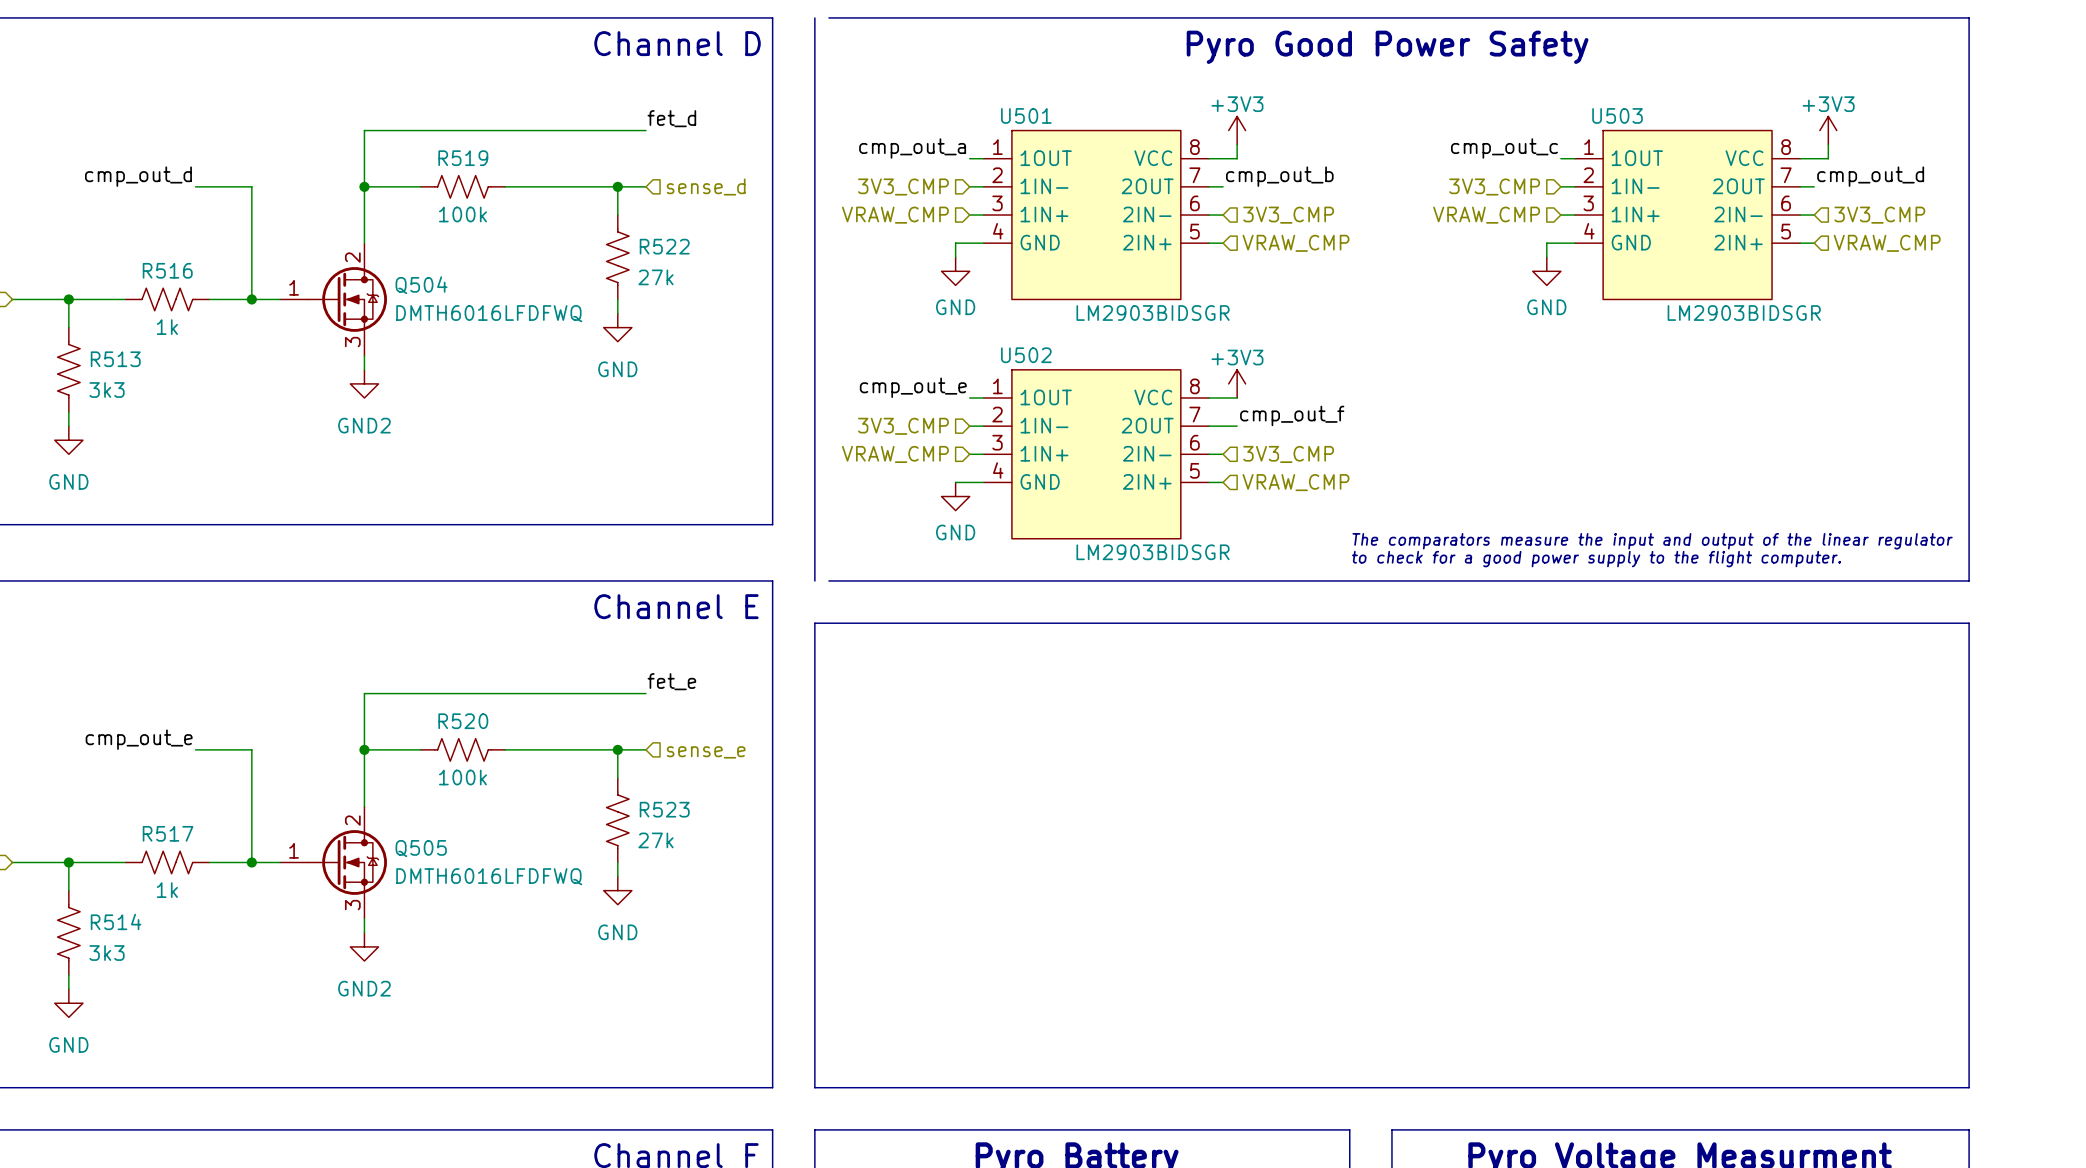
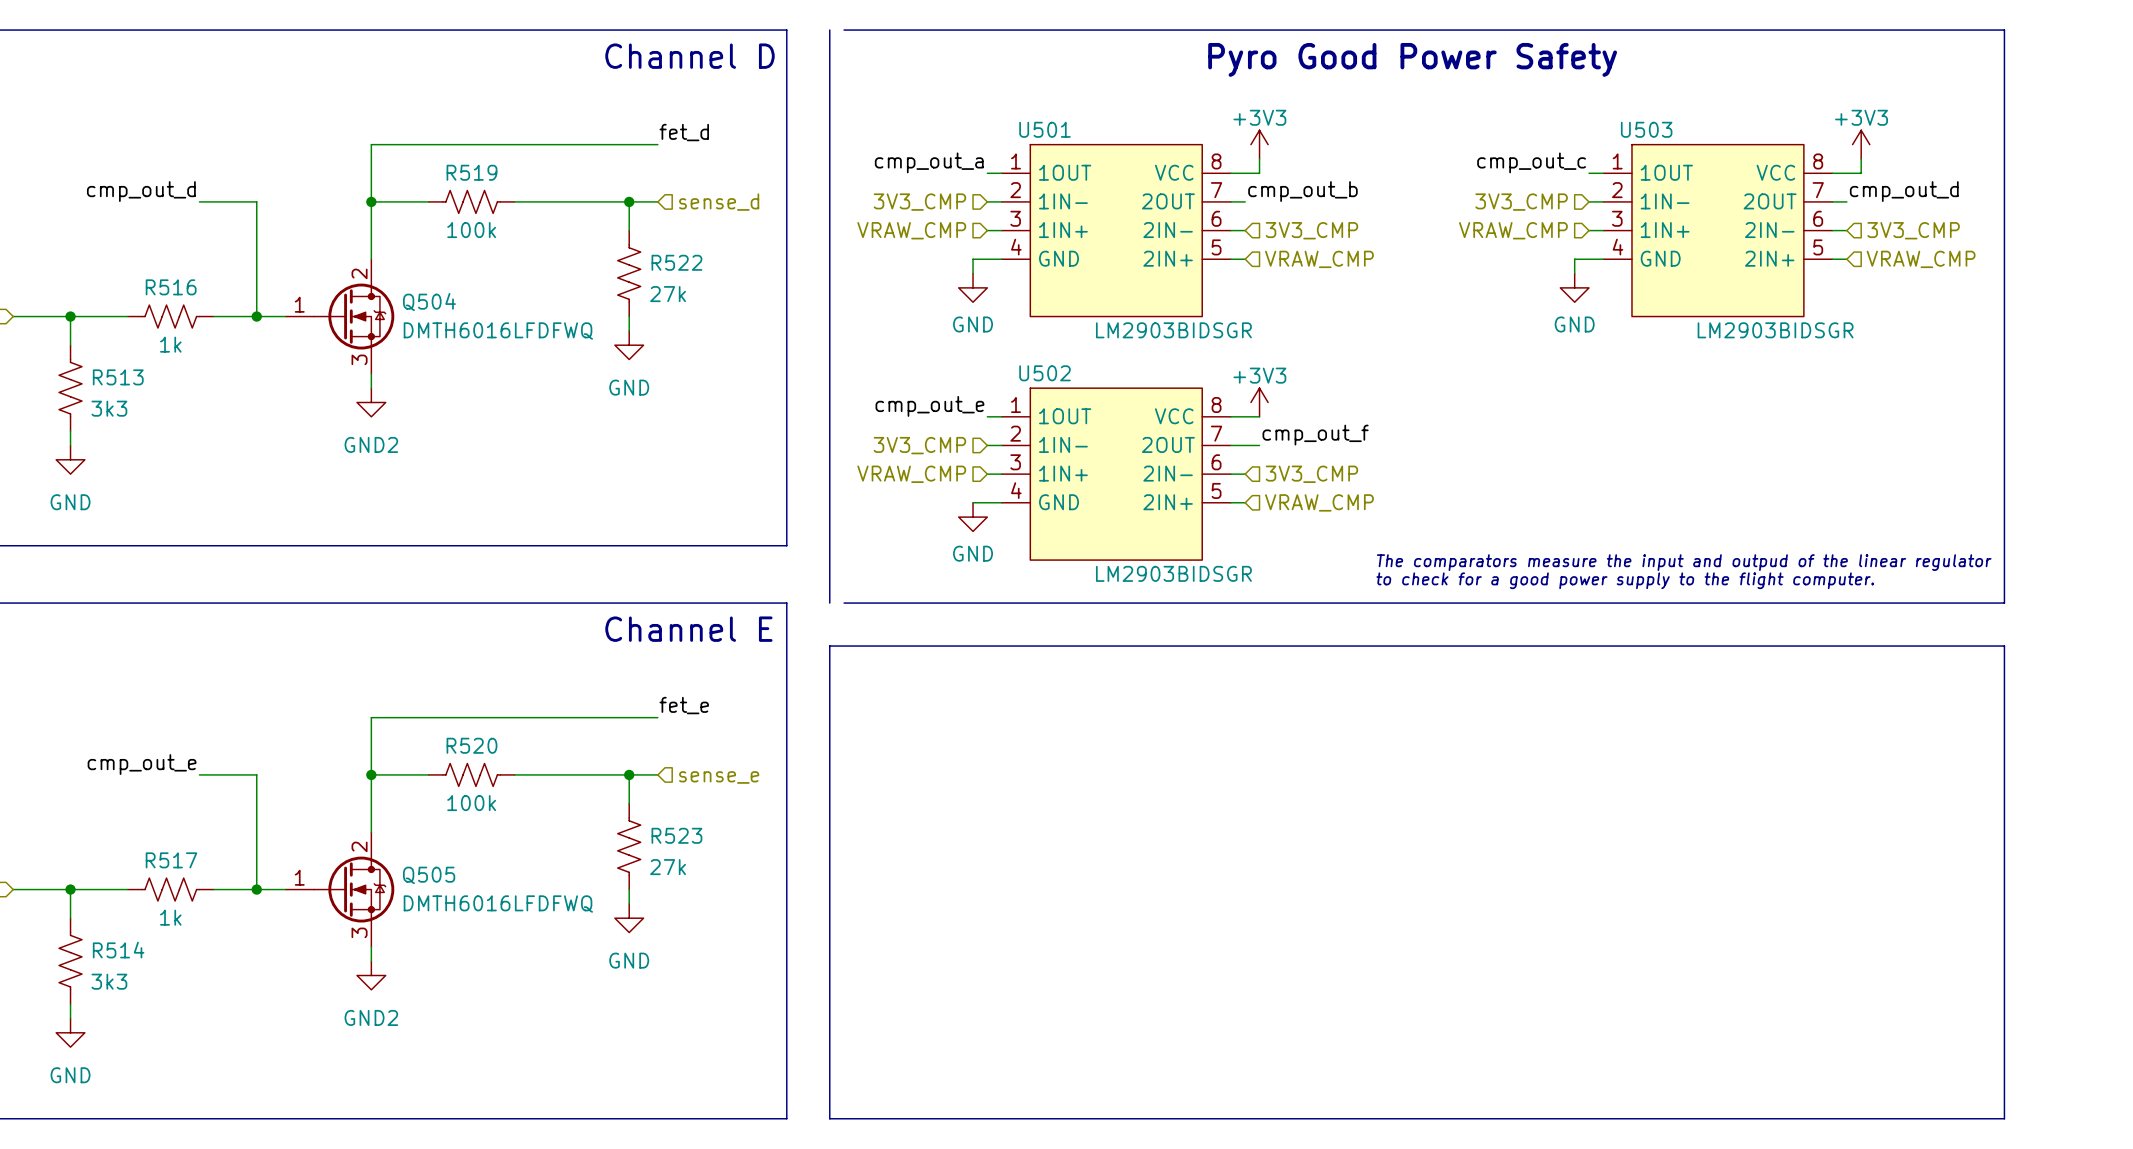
text: The comparators measure the input and output of the linear regulator (1652, 541) -> The comparators measure the input and outpud of the linear regulator (1684, 562)

